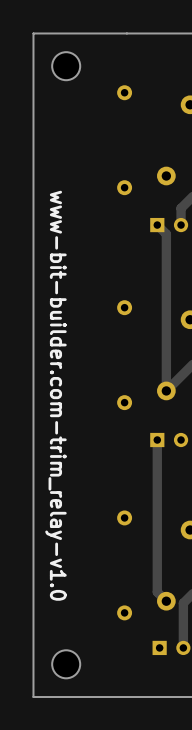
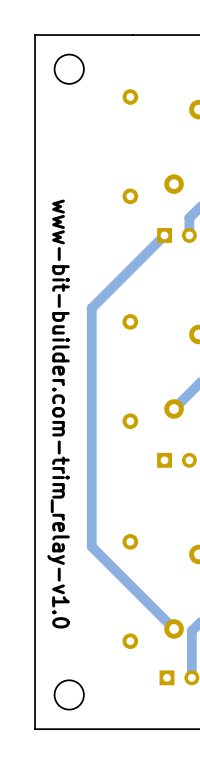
track: (157, 225) (166, 234) (166, 390) -> (164, 235) (91, 308) (91, 546) (164, 619)
track: (157, 440) (157, 592) -> none

